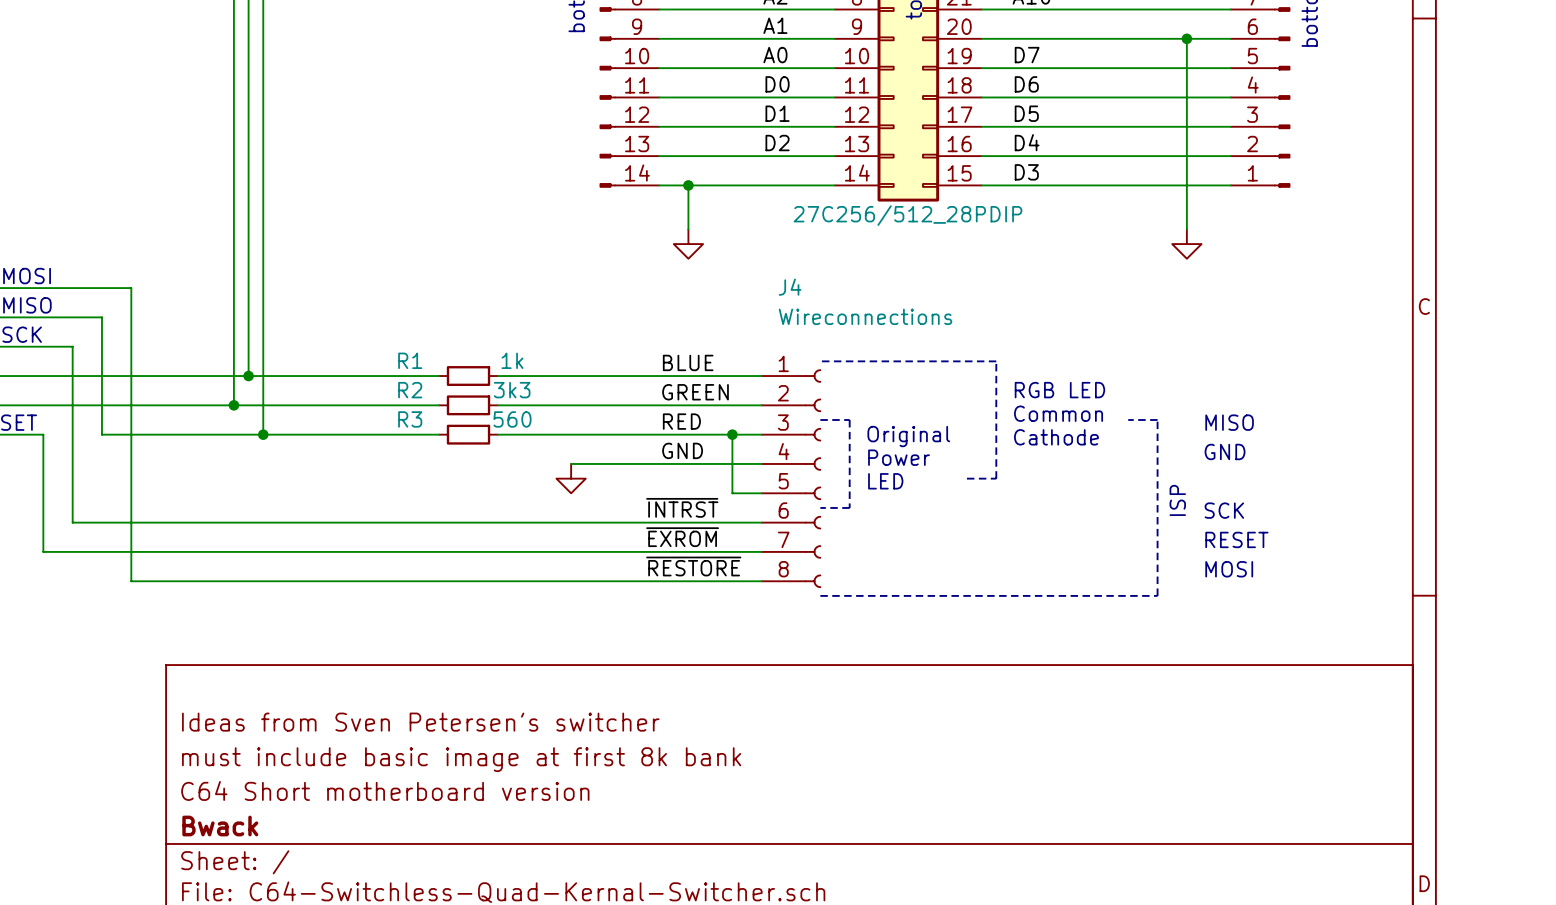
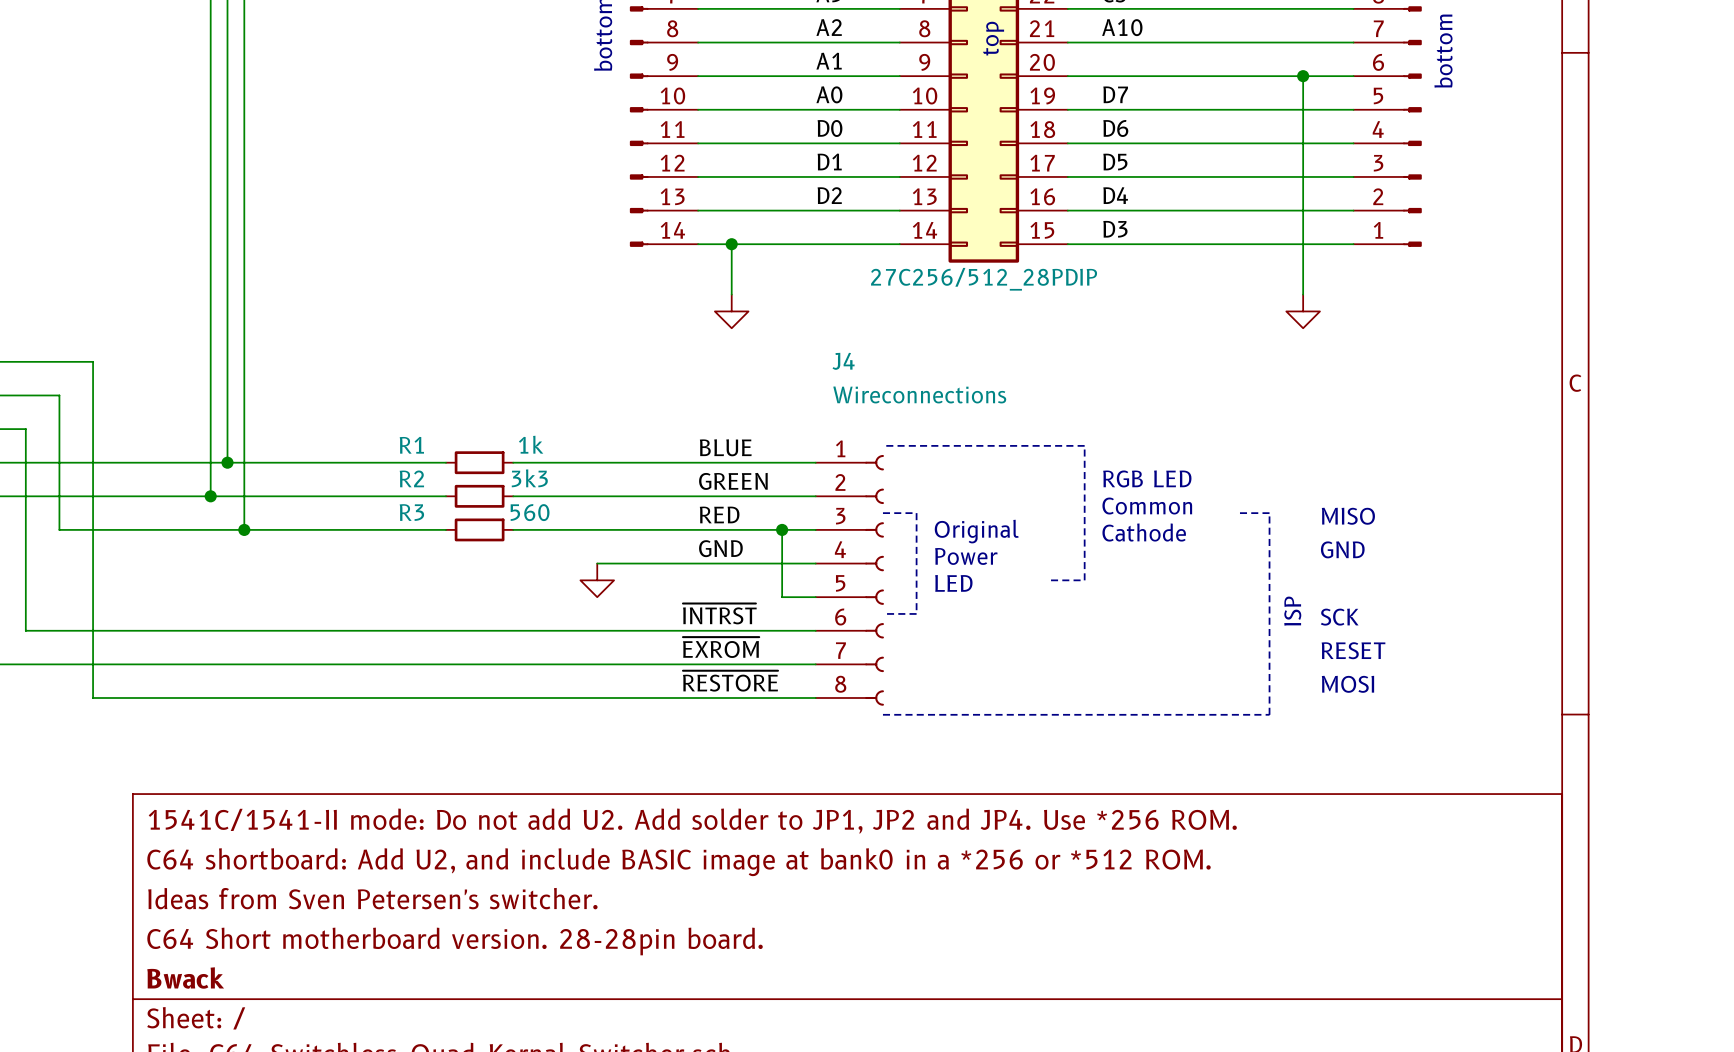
title block: none -> 1541C/1541-II mode: Do not add U2. Add solder to JP1, JP2 and JP4. Use *256 ROM. (692, 821)
title block: Ideas from Sven Petersen's switcher (420, 722) -> C64 shortboard: Add U2, and include BASIC image at bank0 in a *256 or *512 ROM. (679, 862)
title block: must include basic image at first 8k bank (461, 759) -> Ideas from Sven Petersen's switcher. (372, 898)
title block: C64 Short motherboard version (385, 790) -> C64 Short motherboard version. 28-28pin board. (455, 941)

